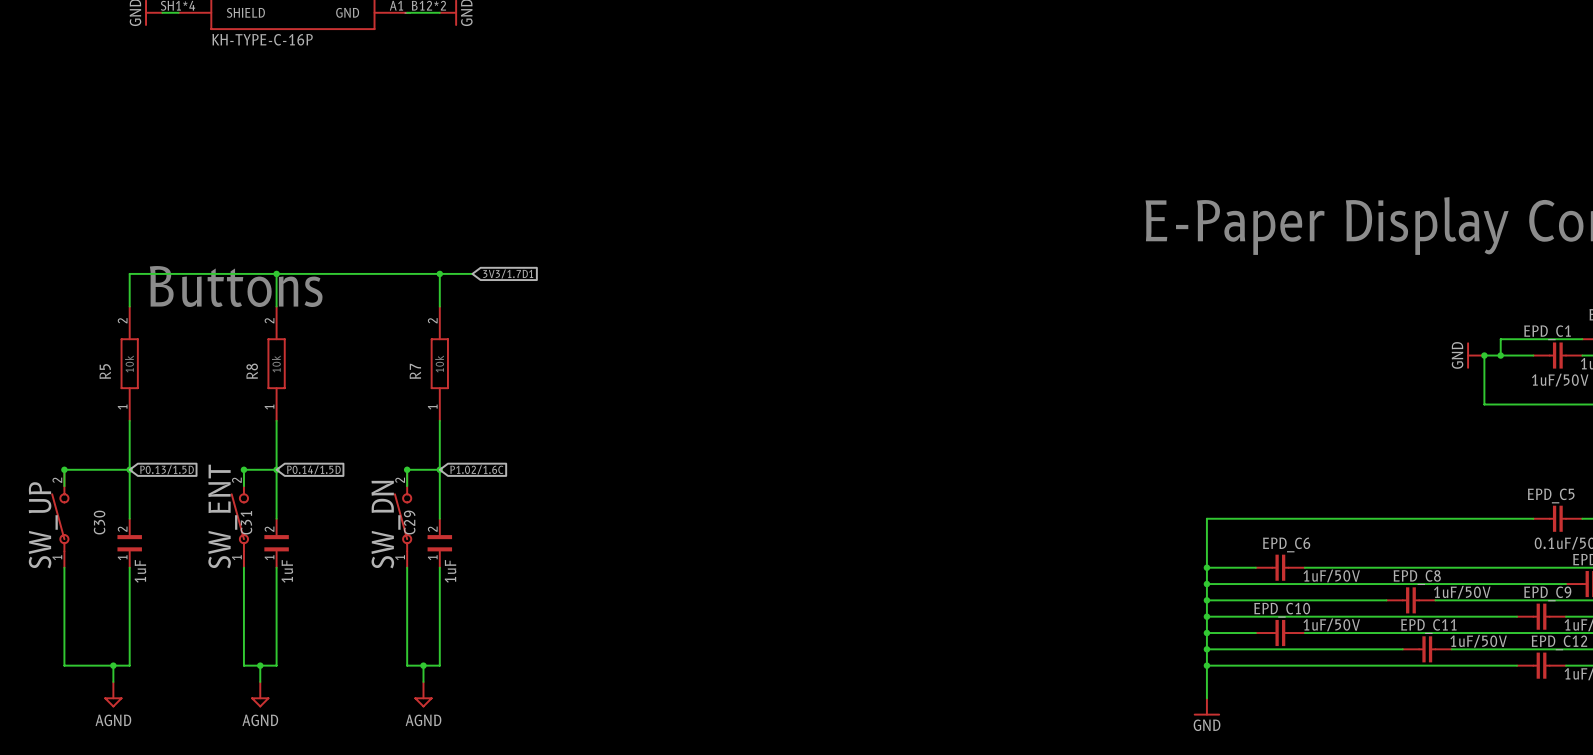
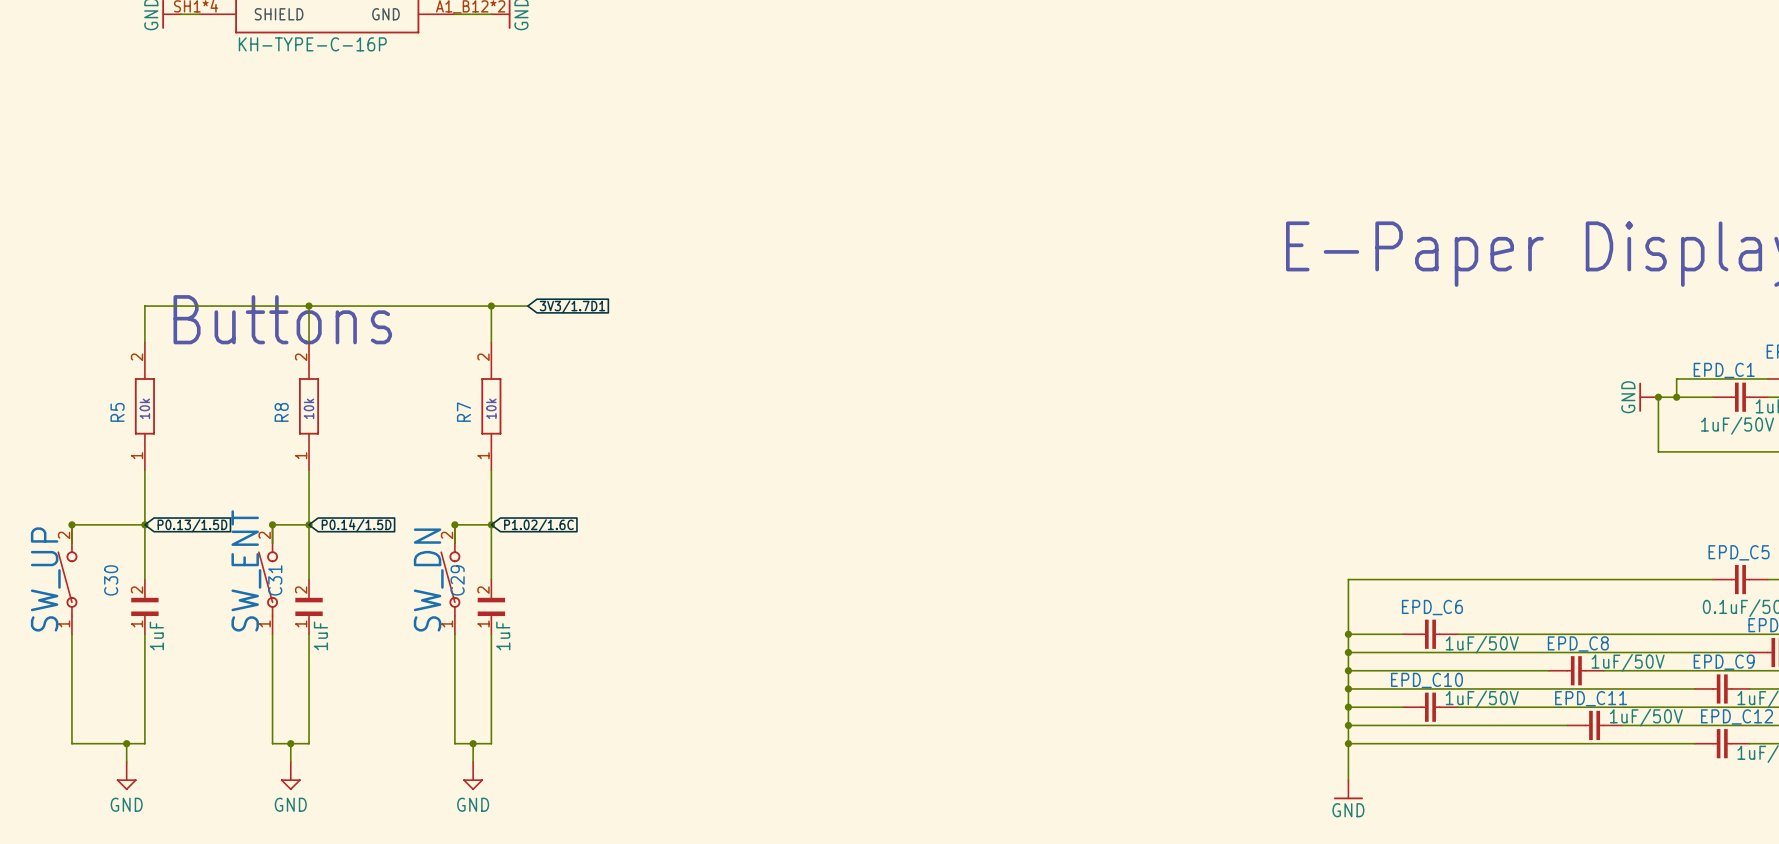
power symbol: AGND (113, 694) -> GND (126, 775)
power symbol: AGND (260, 694) -> GND (290, 775)
power symbol: AGND (423, 694) -> GND (473, 775)

